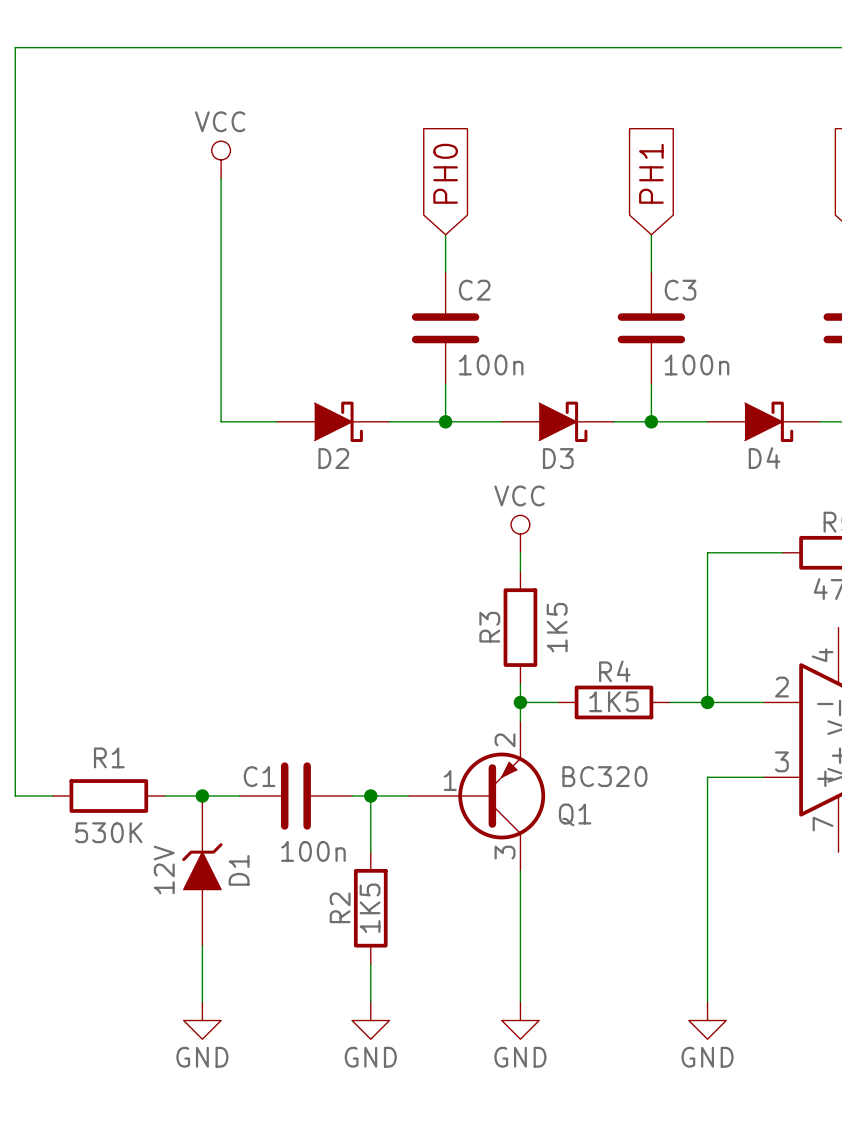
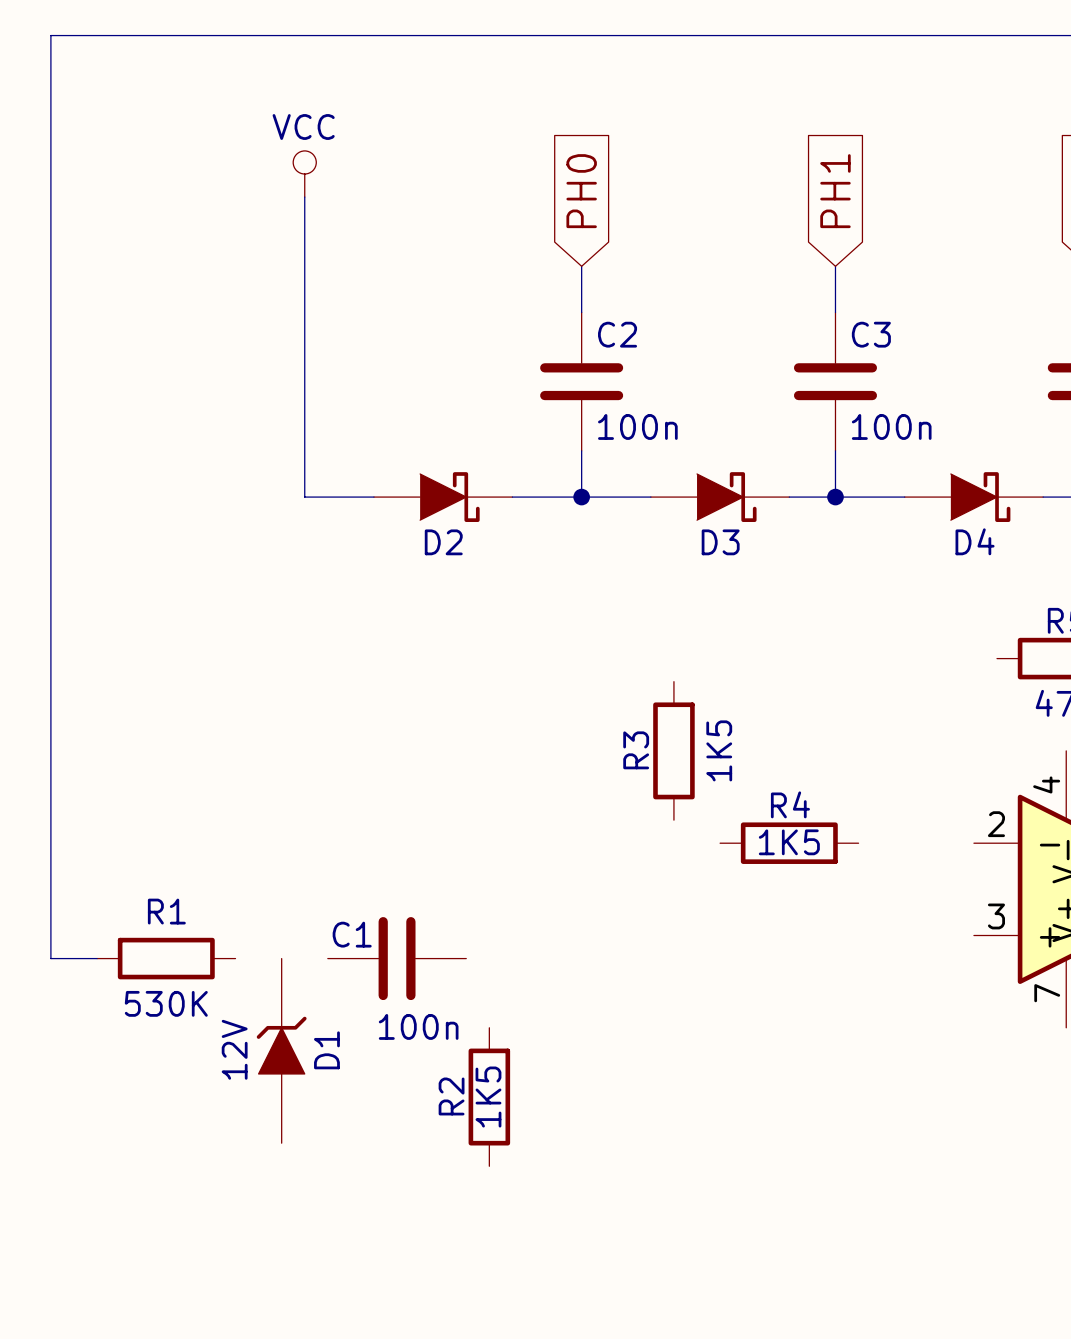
power symbol: VCC (520, 534) -> none
wire: (520, 552) (520, 571) -> none
wire: (782, 552) (707, 552) (707, 702) -> none
wire: (520, 683) (520, 721) -> none
wire: (520, 702) (557, 702) -> none
junction: (520, 702) -> none
wire: (670, 702) (763, 702) -> none
junction: (707, 702) -> none
wire: (763, 777) (707, 777) (707, 1001) -> none
wire: (164, 796) (239, 796) -> none
junction: (202, 796) -> none
wire: (352, 796) (408, 796) -> none
wire: (370, 796) (370, 852) -> none
junction: (370, 796) -> none
Q1: BC320 (476, 796) -> none
wire: (520, 870) (520, 1001) -> none
wire: (202, 945) (202, 1001) -> none
wire: (370, 964) (370, 1001) -> none
power symbol: GND (202, 1020) -> none
power symbol: GND (370, 1020) -> none
power symbol: GND (520, 1020) -> none
power symbol: GND (707, 1020) -> none

